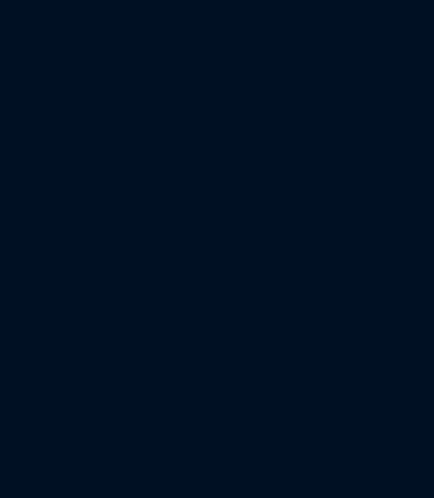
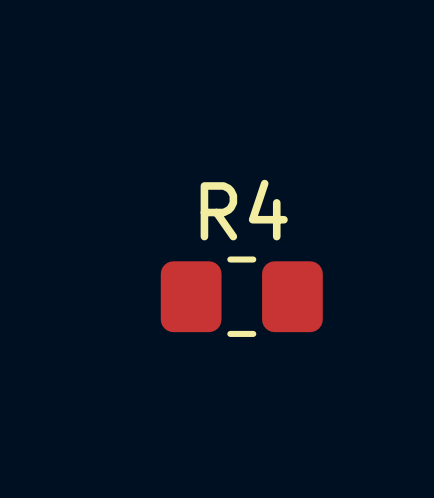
R4: none -> (241, 296)

